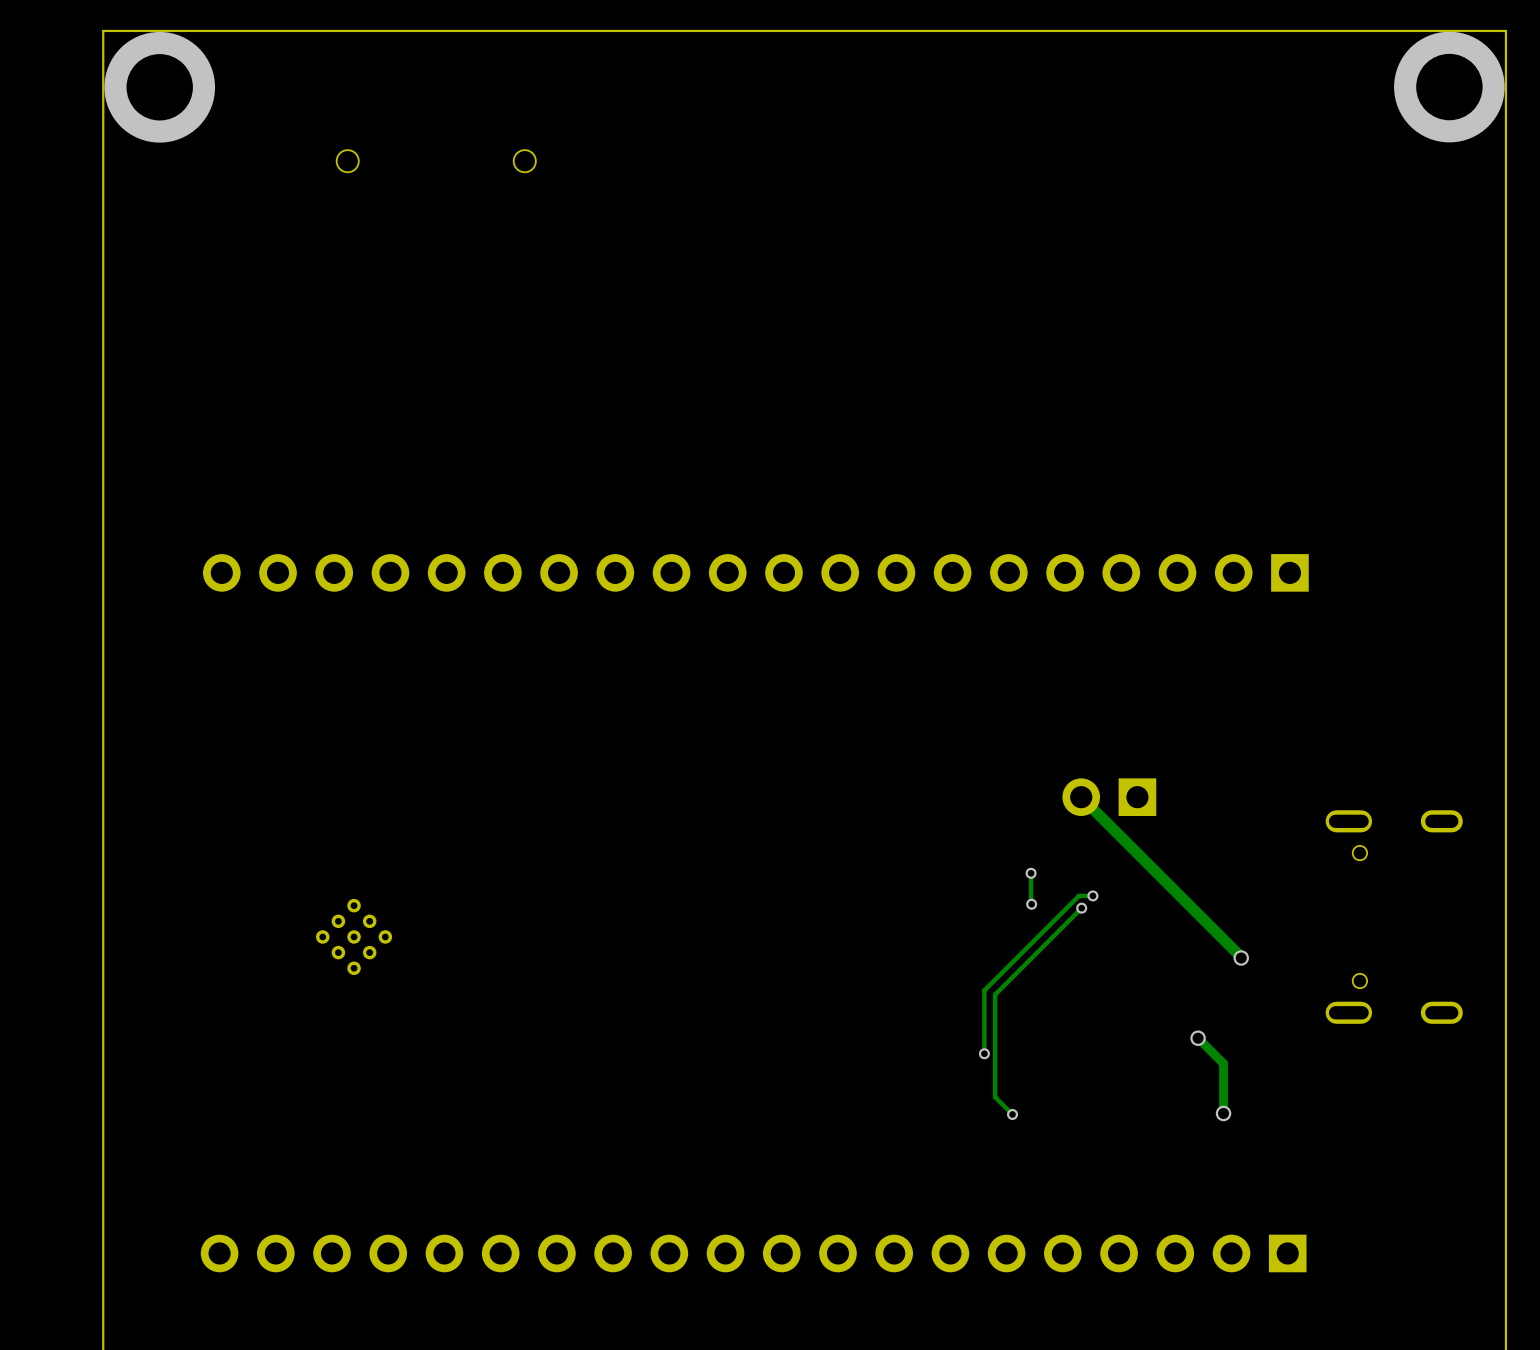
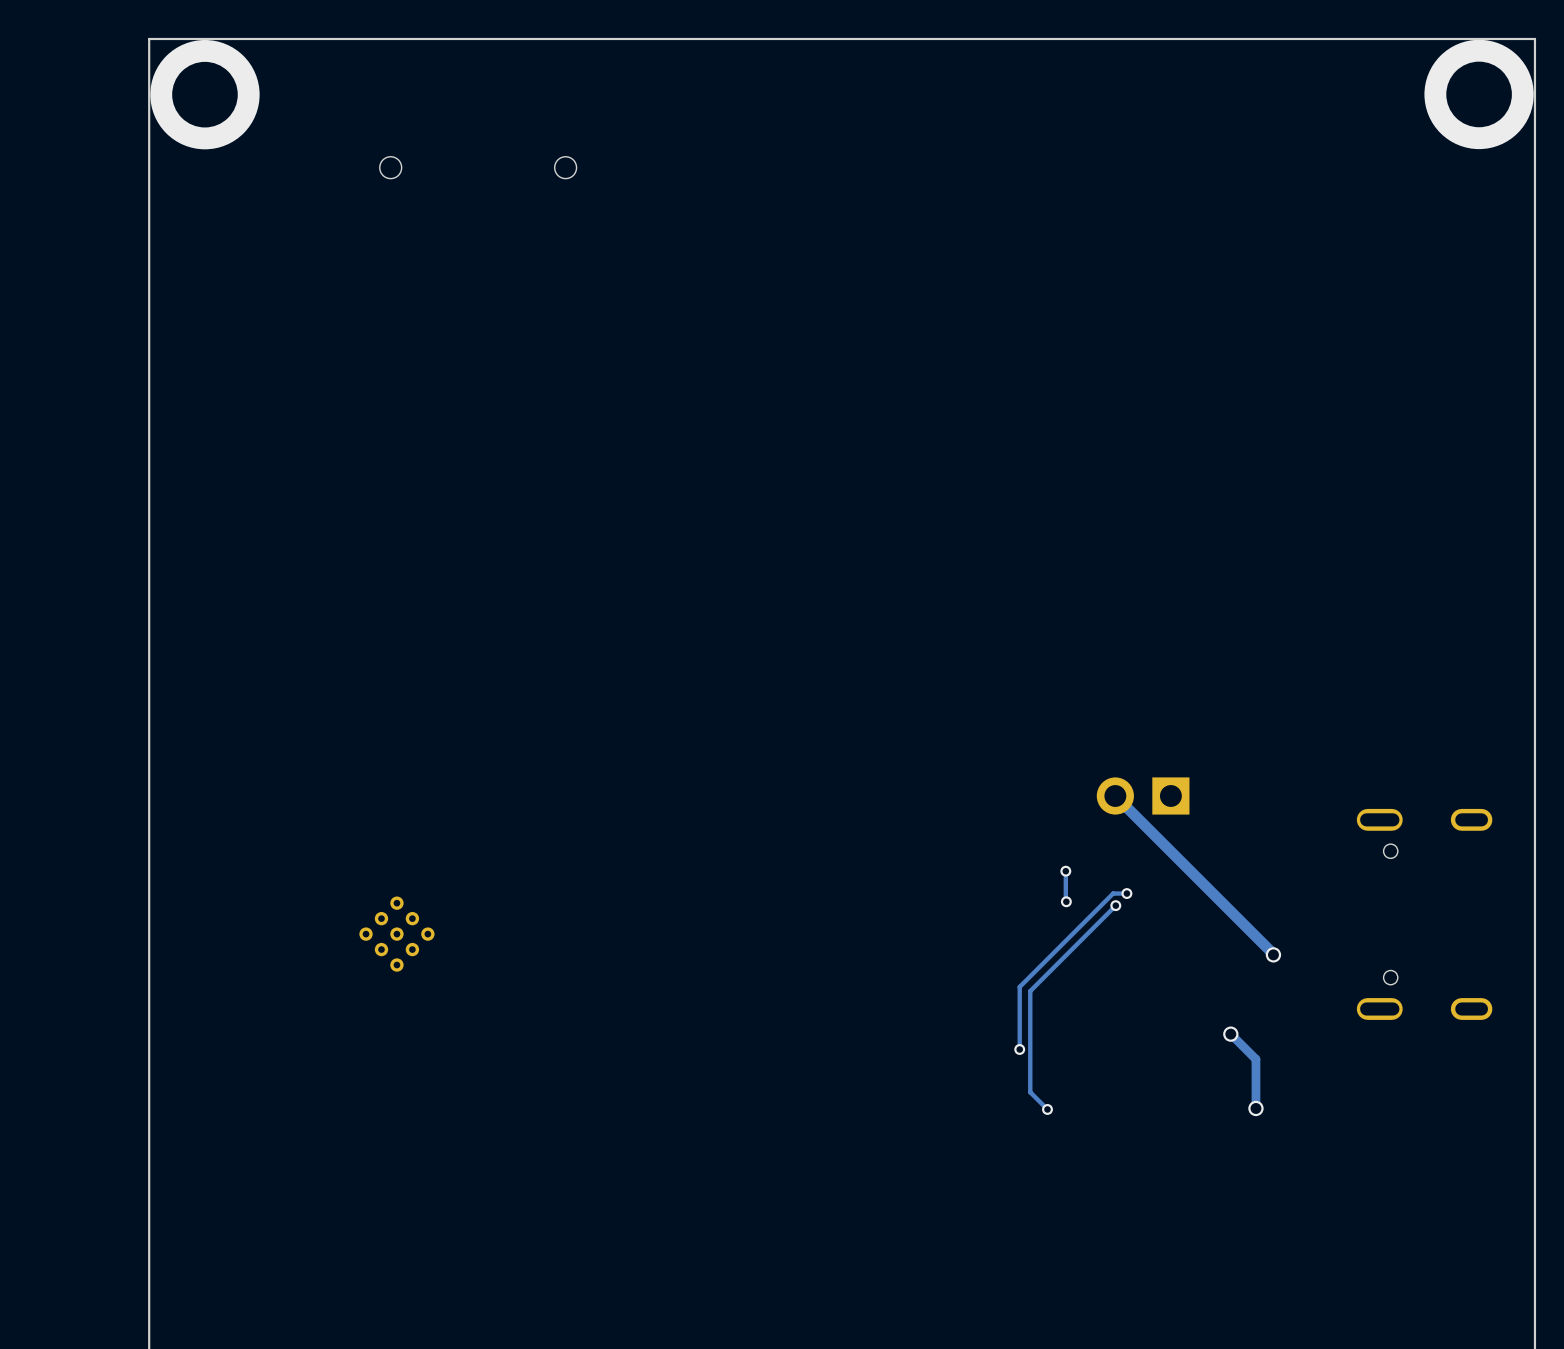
part: (755, 572) -> none
part: (753, 1253) -> none

